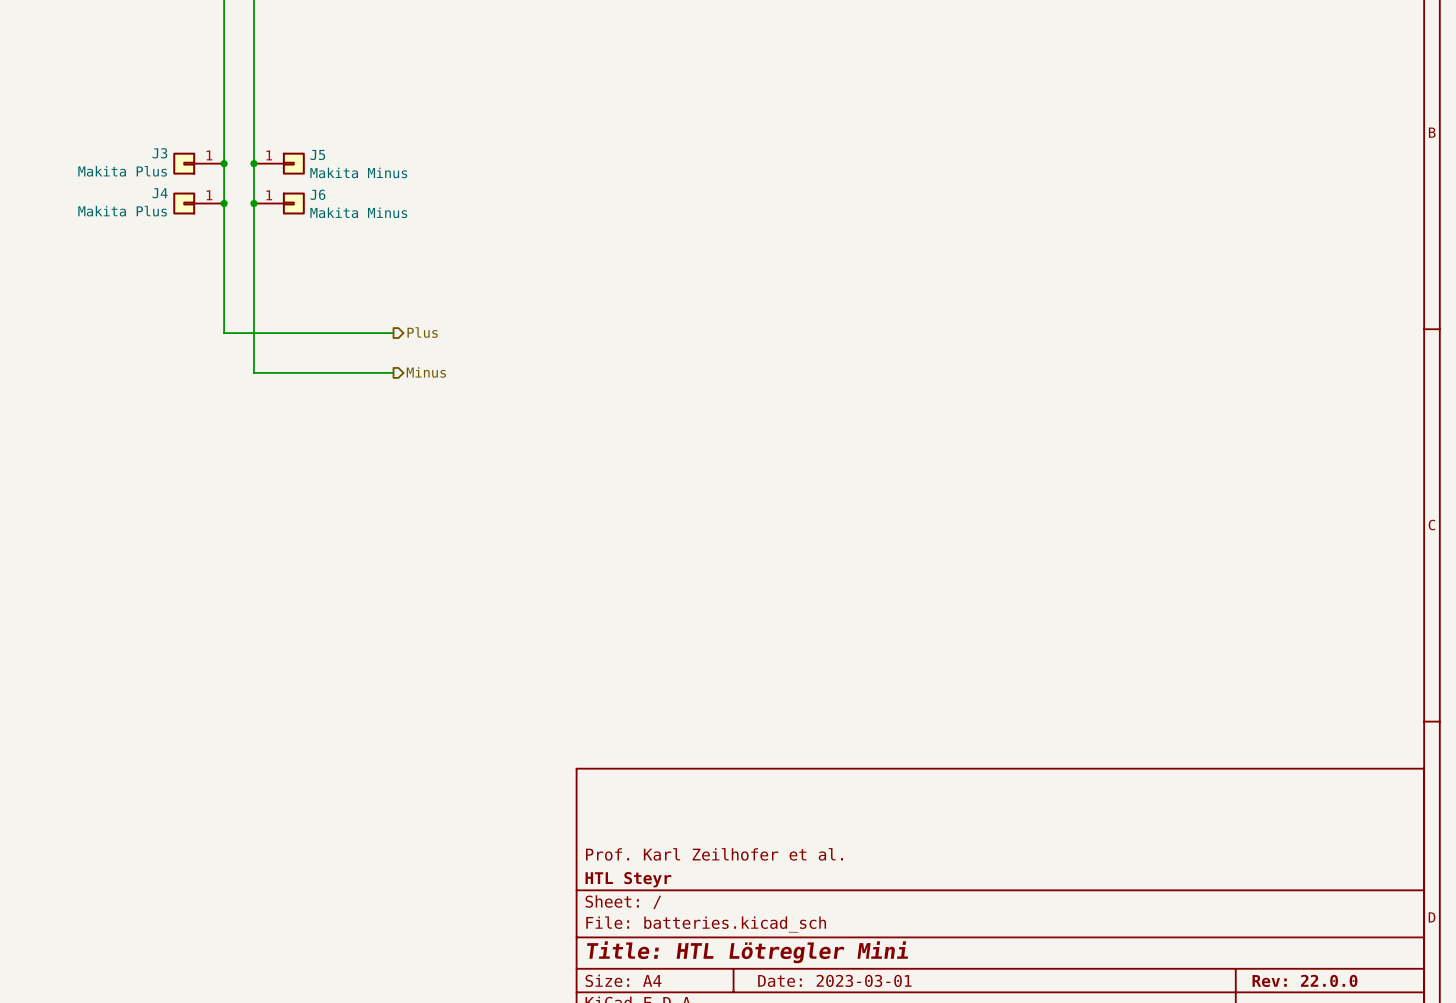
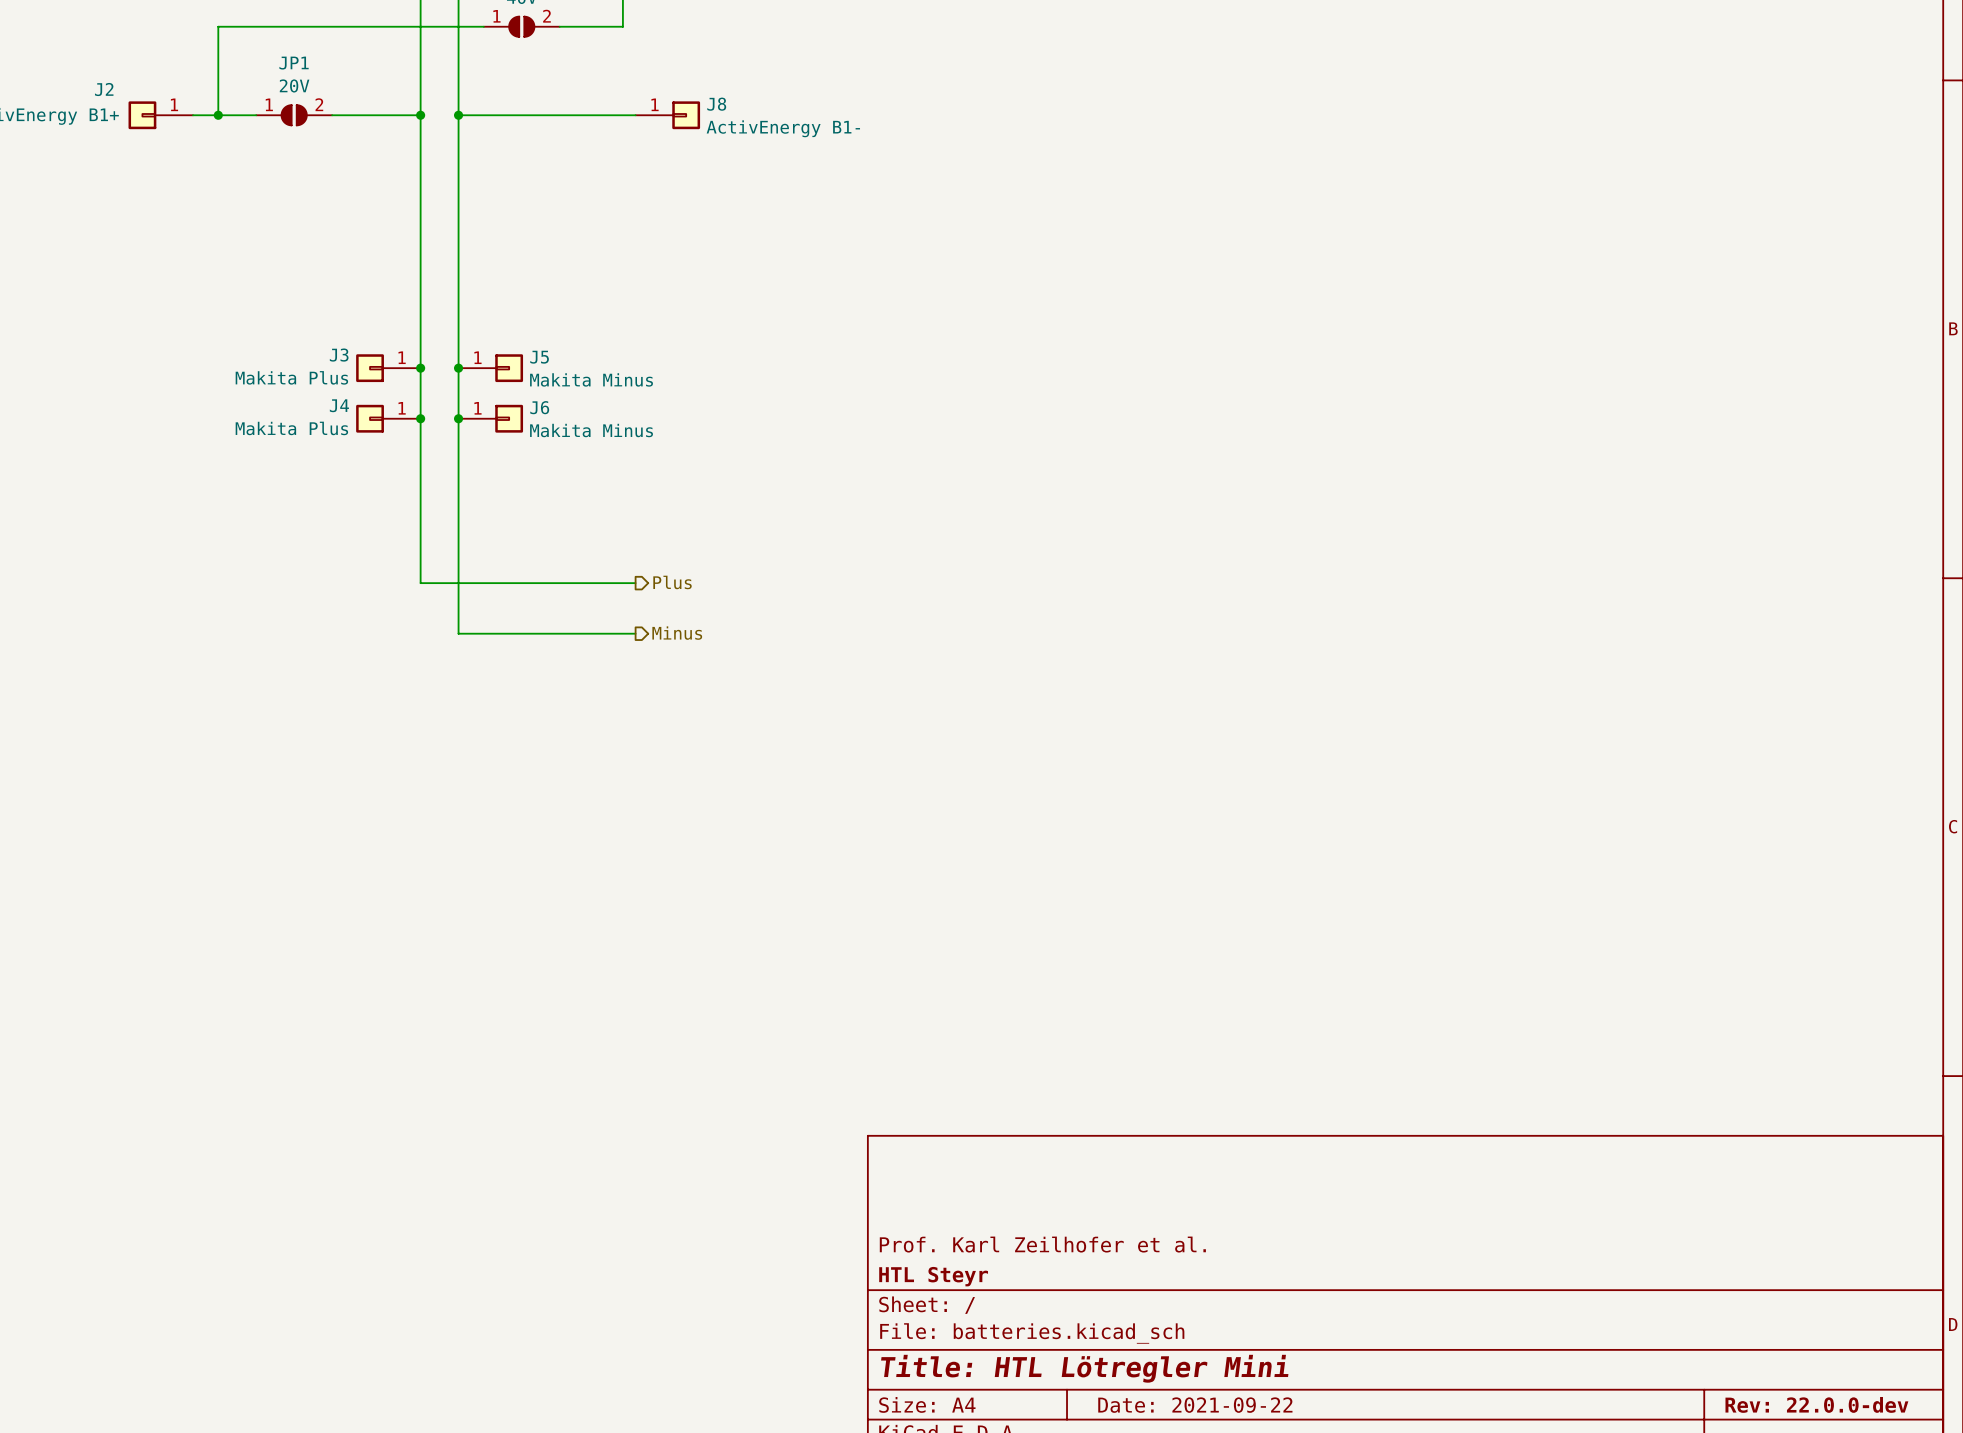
title block: Date: 2023-03-01 (834, 980) -> Date: 2021-09-22 (1195, 1405)
title block: Rev: 22.0.0 (1304, 980) -> Rev: 22.0.0-dev (1816, 1404)

